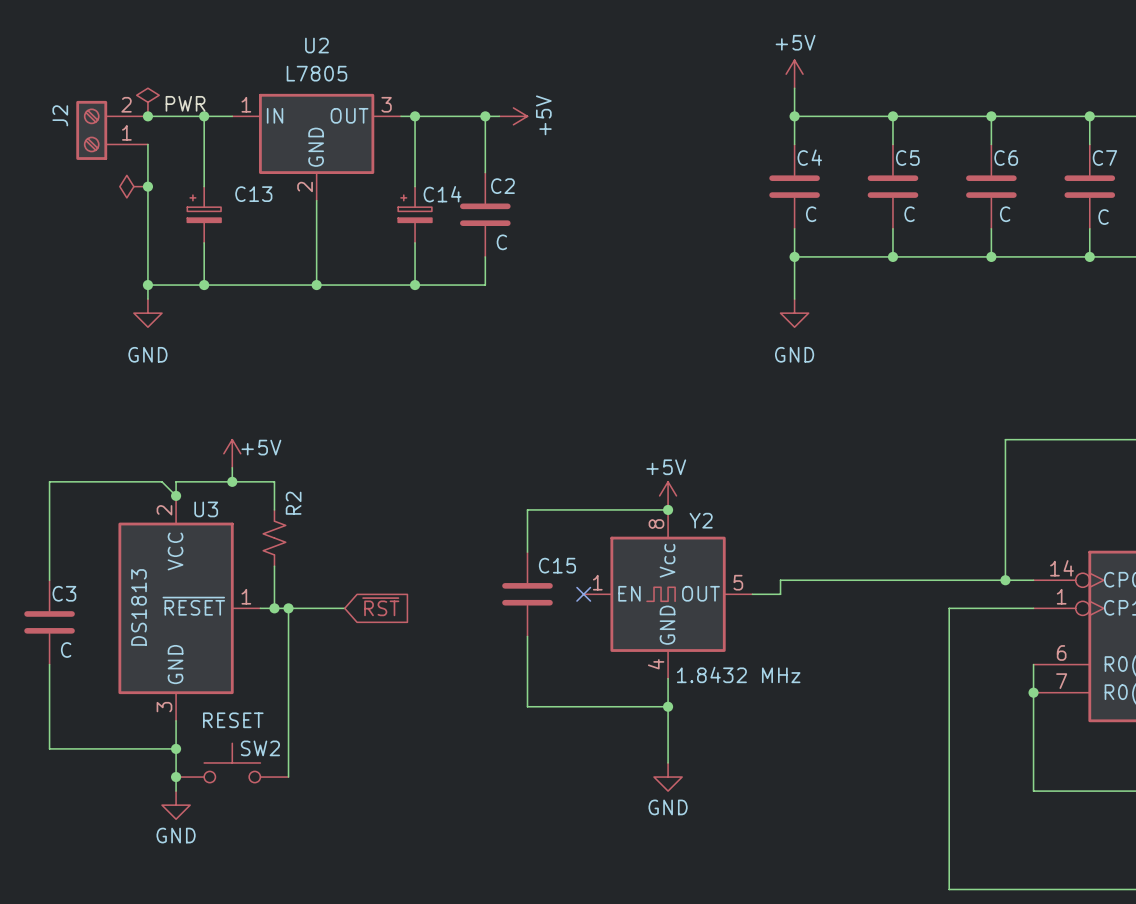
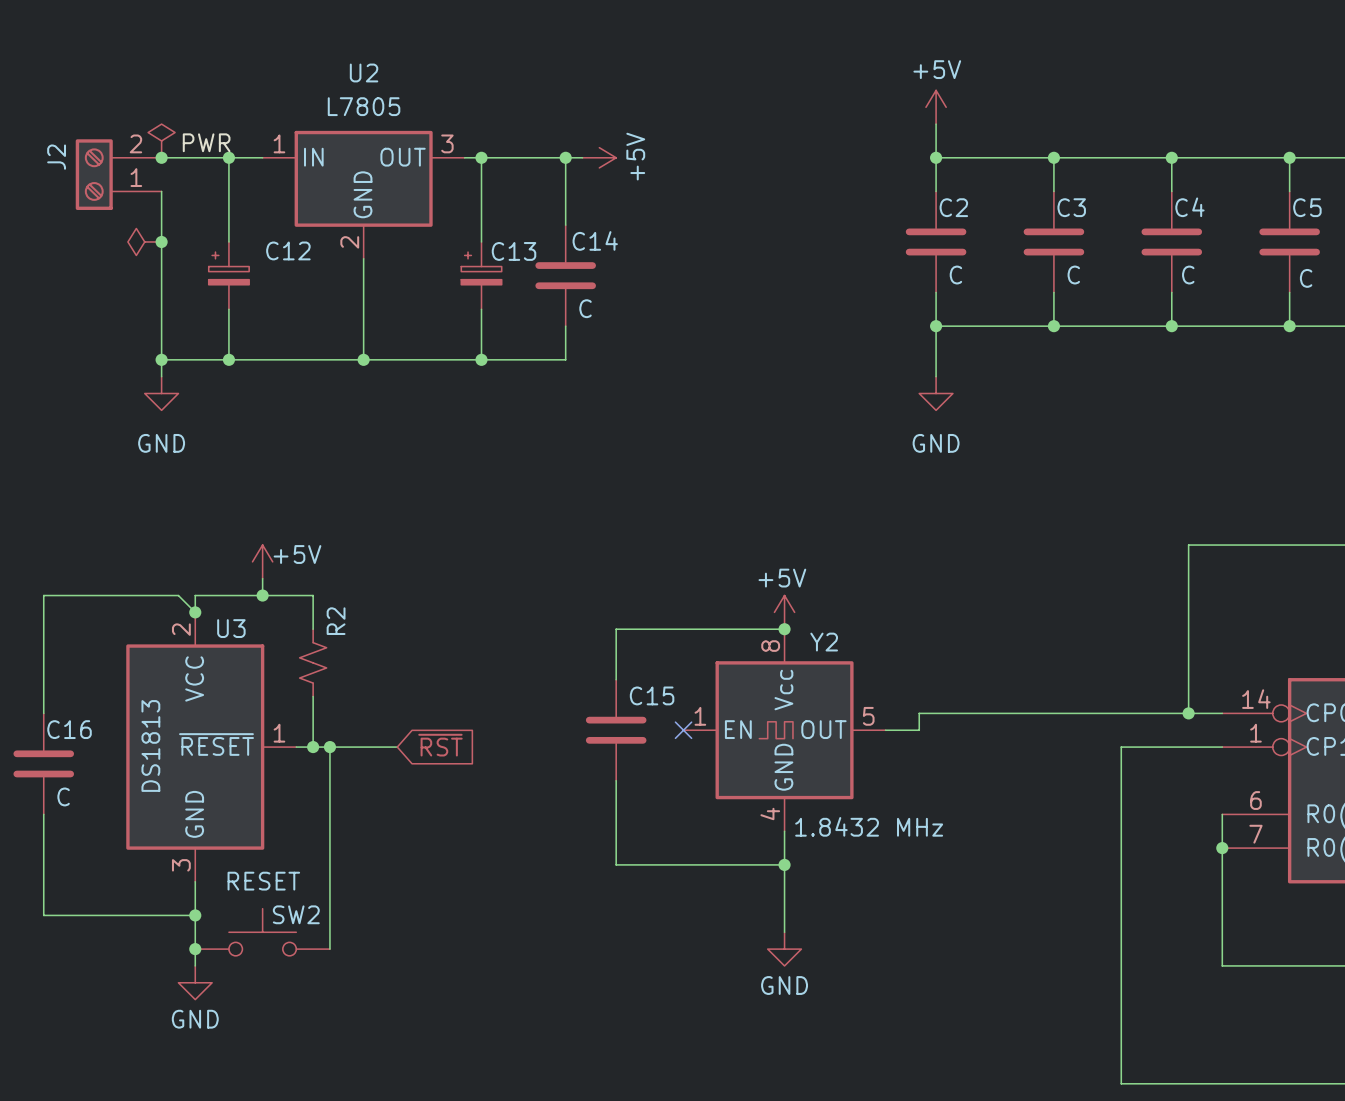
C4 name: C4 (809, 157) -> C2 (953, 207)
C5 name: C5 (907, 158) -> C3 (1071, 207)
C6 name: C6 (1006, 158) -> C4 (1189, 207)
C7 name: C7 (1104, 158) -> C5 (1307, 207)
C2 name: C2 (502, 186) -> C14 (595, 240)
C13 name: C13 (253, 194) -> C12 (288, 250)
C14 name: C14 (442, 194) -> C13 (514, 251)
C3 name: C3 (64, 593) -> C16 (69, 729)

